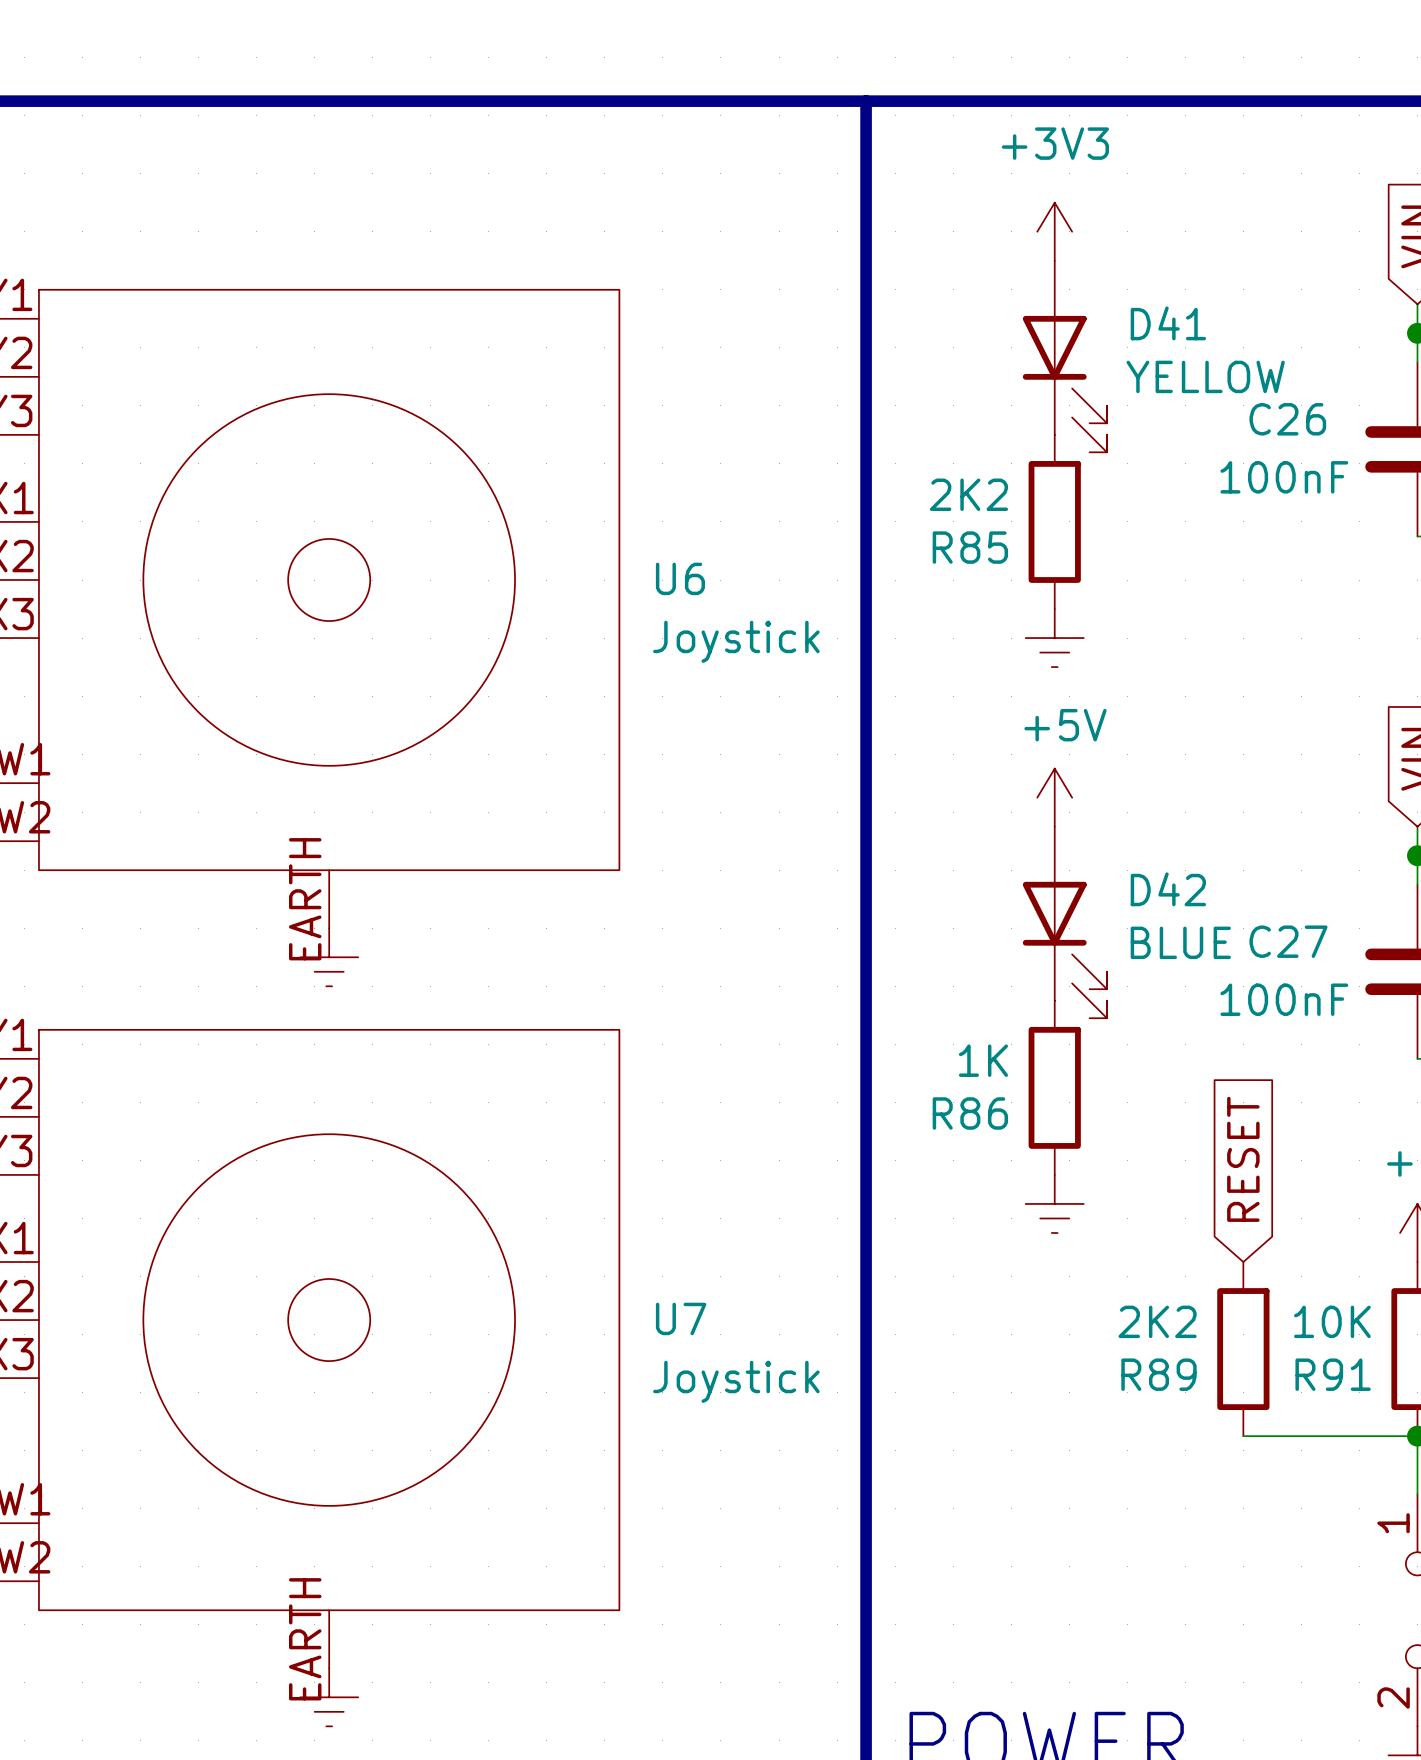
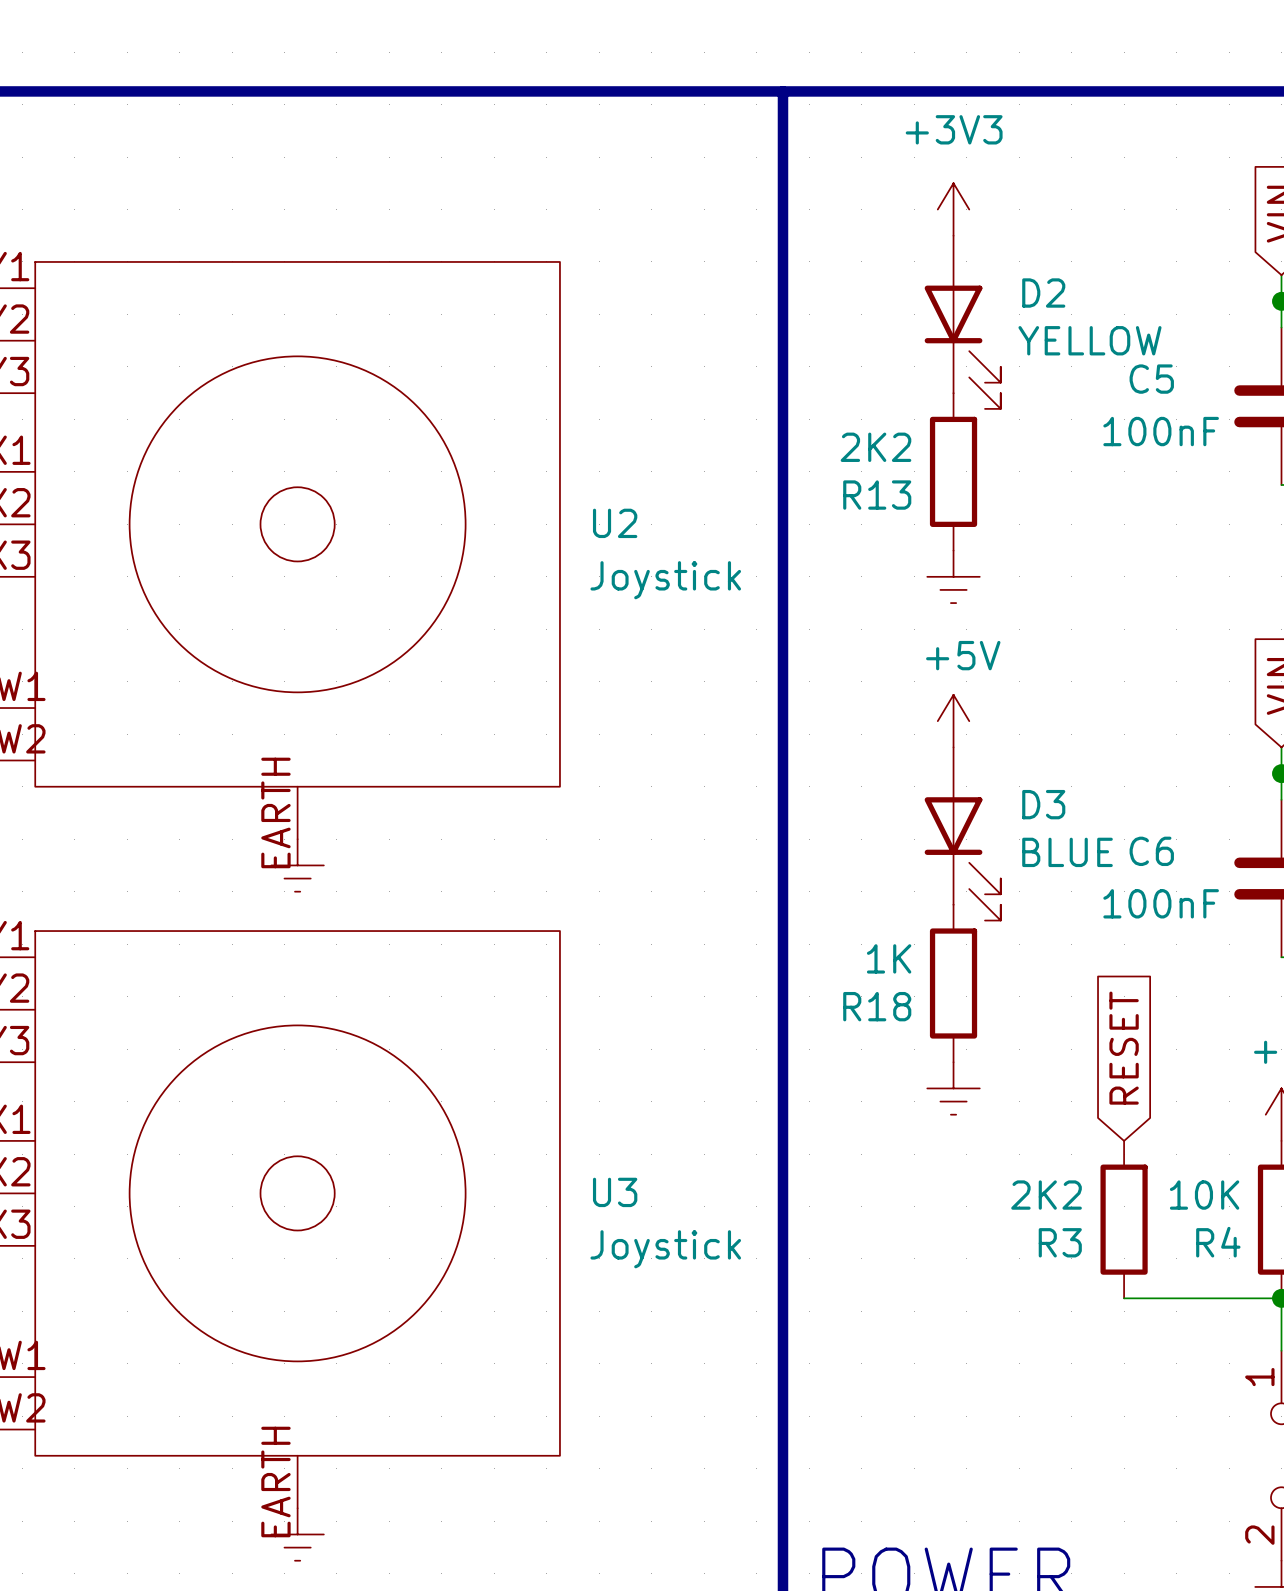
D41 name: D41 (1168, 323) -> D2 (1043, 293)
C26 name: C26 (1287, 419) -> C5 (1151, 379)
R85 name: R85 (970, 547) -> R13 (877, 495)
U6 name: U6 (680, 578) -> U2 (615, 523)
D42 name: D42 (1168, 889) -> D3 (1043, 804)
C27 name: C27 (1288, 941) -> C6 (1151, 851)
R86 name: R86 (970, 1113) -> R18 (877, 1006)
U7 name: U7 (681, 1318) -> U3 (615, 1192)
R89 name: R89 (1158, 1374) -> R3 (1060, 1242)
R91 name: R91 (1333, 1374) -> R4 (1218, 1242)

